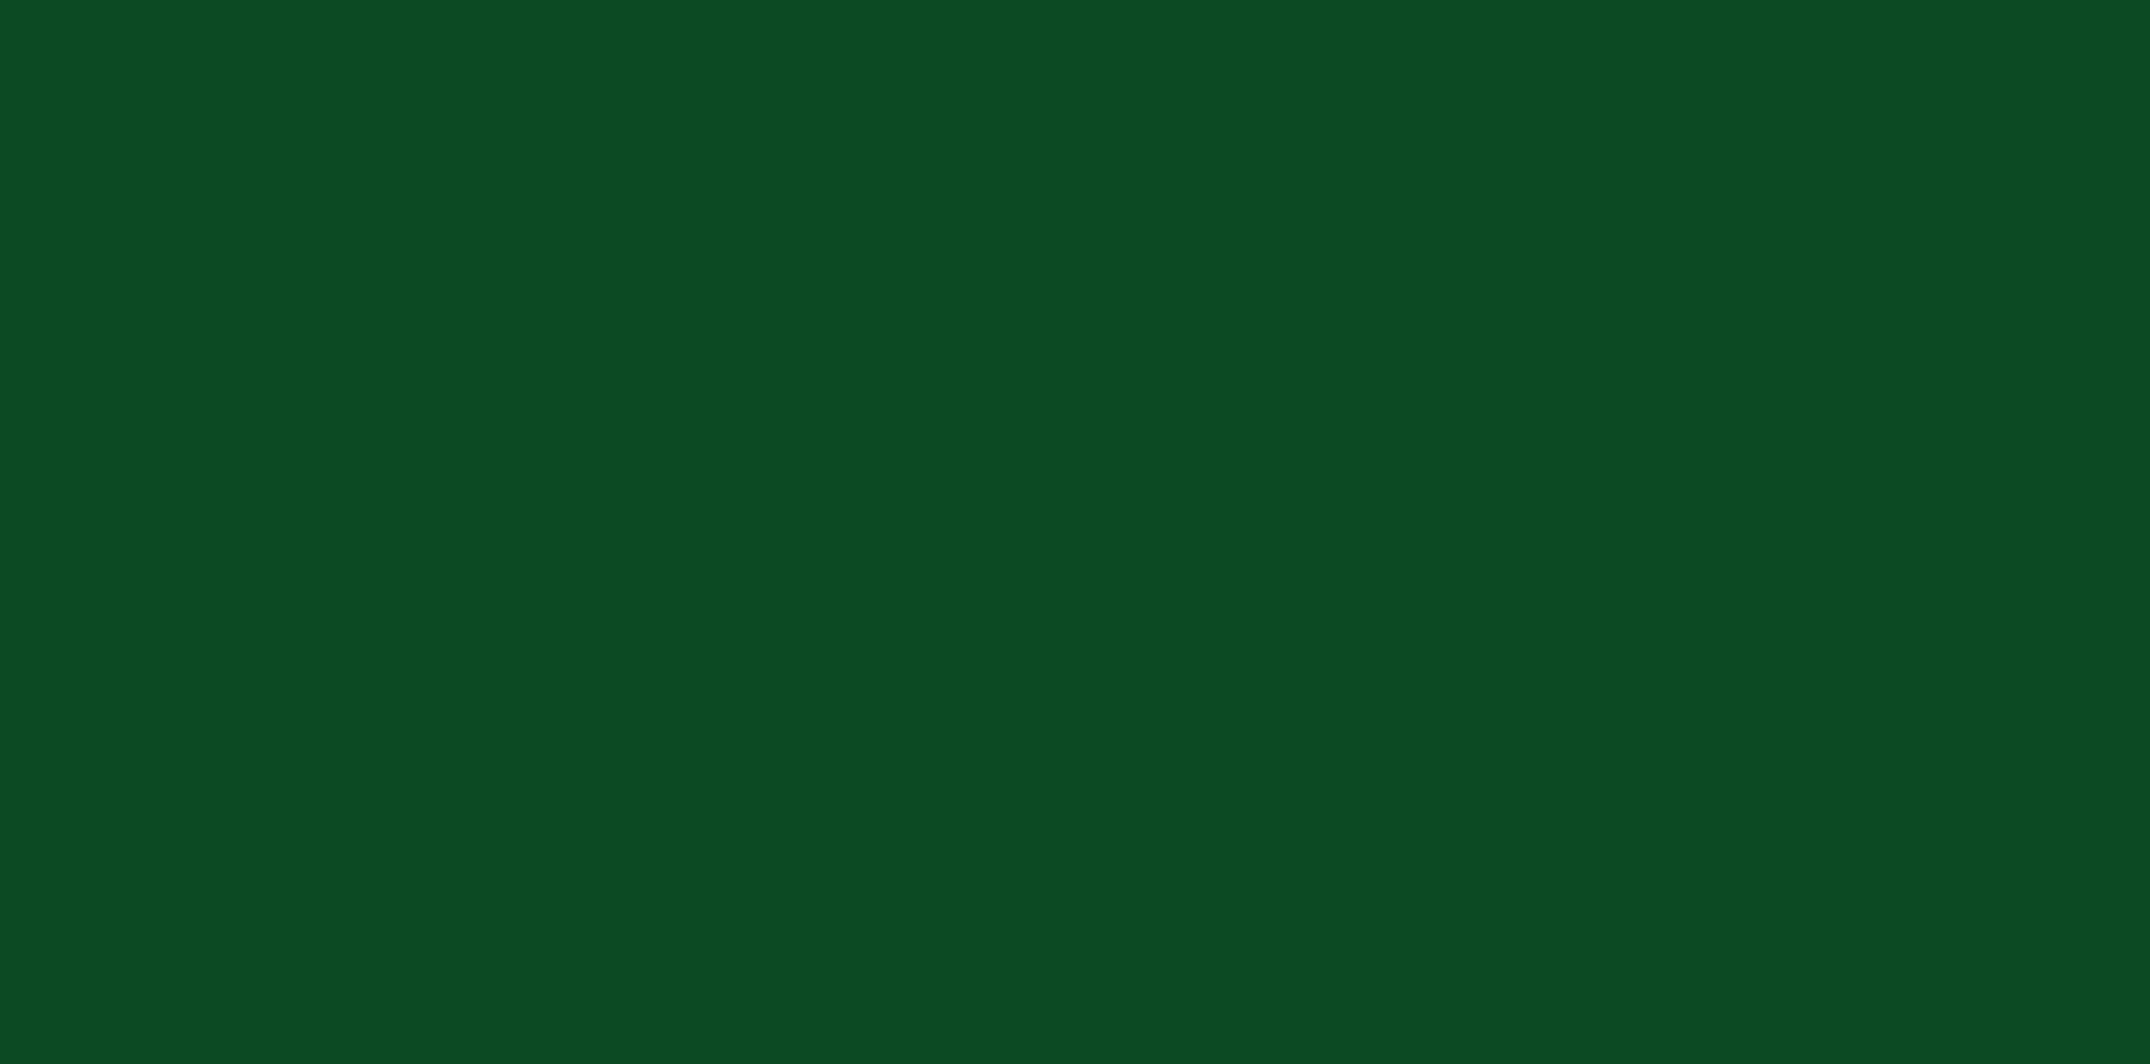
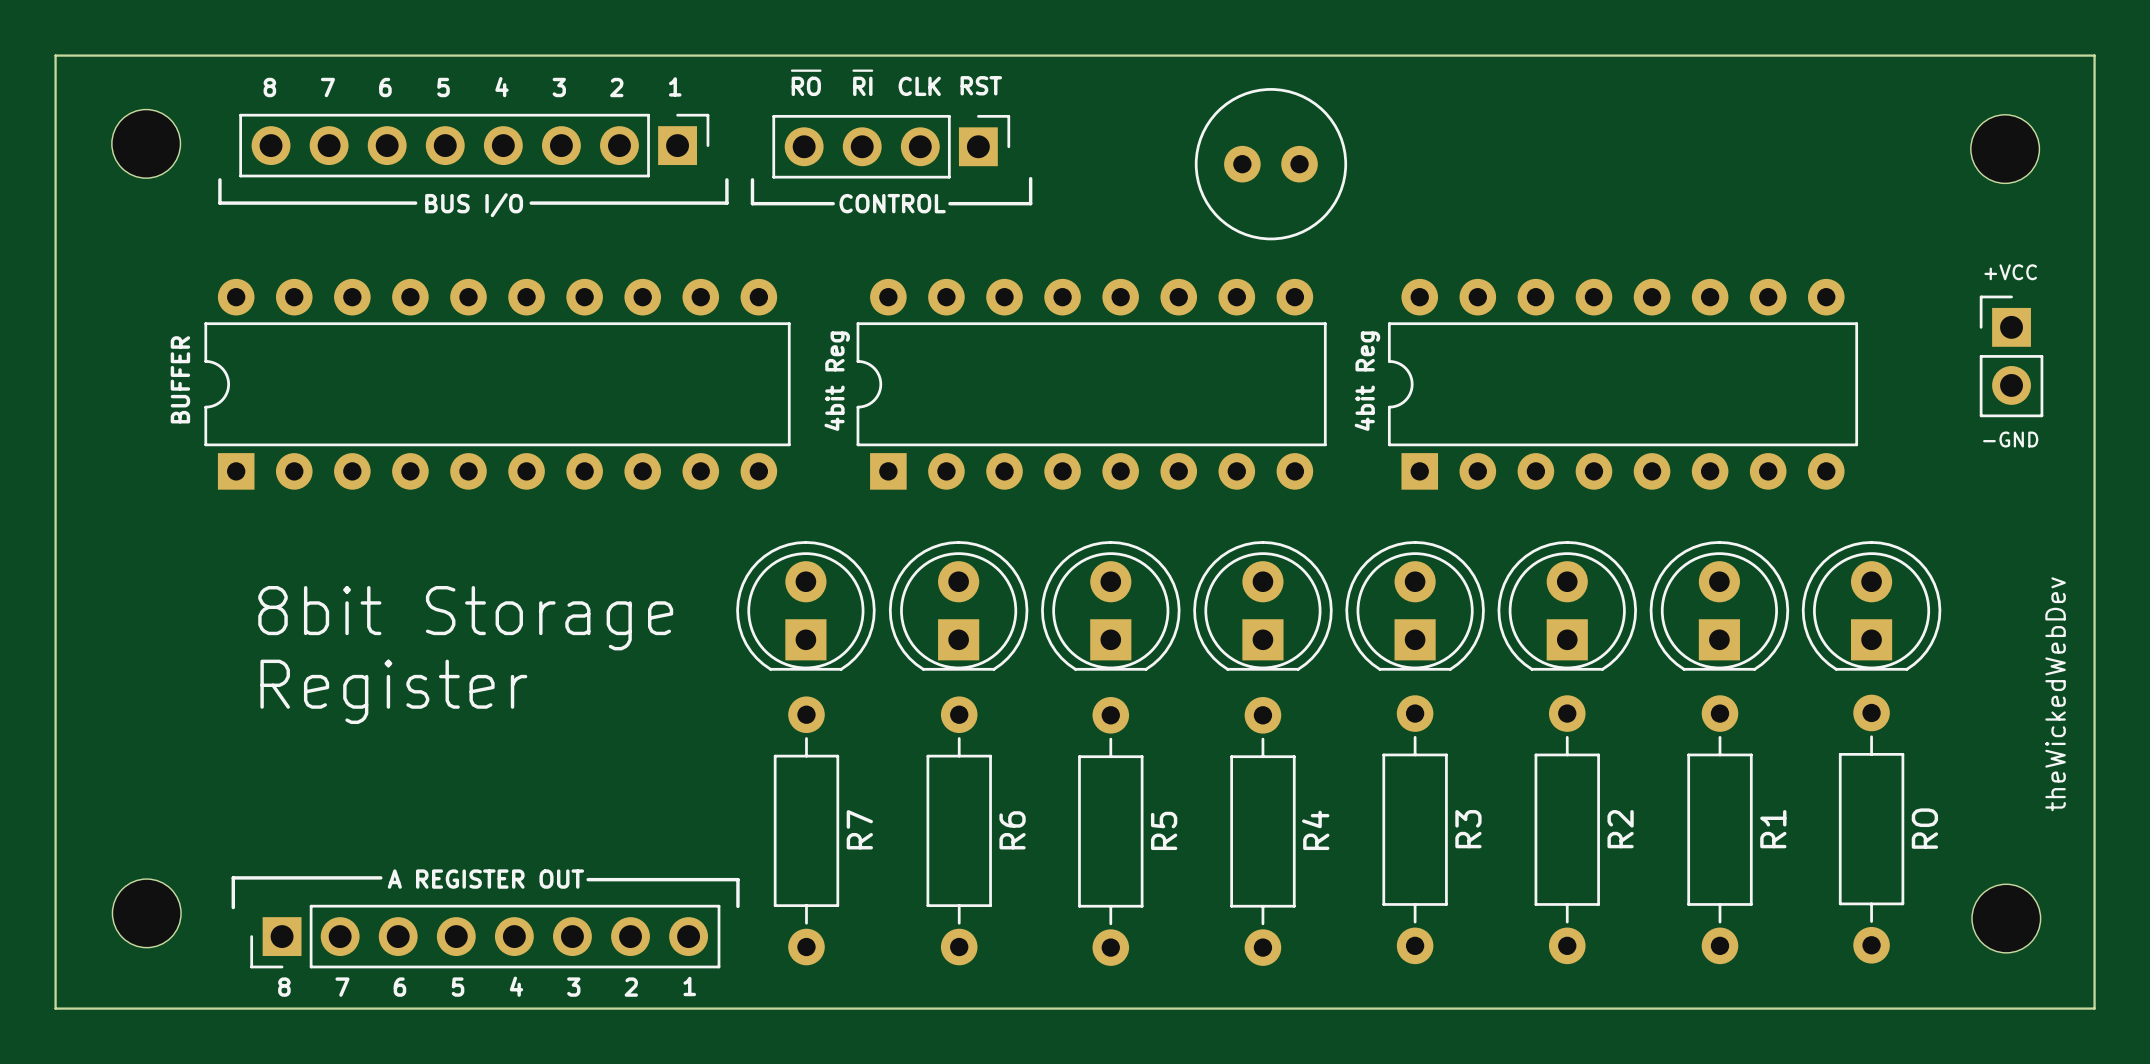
board edge: none -> (55, 55) (2094, 55) (2094, 1008) (55, 1008) (55, 55)
line: none -> (791, 70) (820, 70)
line: none -> (853, 70) (872, 70)
text: none -> RST (981, 85)
text: none -> 1 (675, 86)
text: none -> RO (806, 86)
text: none -> RI (862, 86)
text: none -> CLK (919, 86)
text: none -> 8 (269, 87)
text: none -> 7 (327, 87)
text: none -> 6 (385, 87)
text: none -> 5 (443, 87)
text: none -> 4 (501, 87)
text: none -> 3 (559, 87)
text: none -> 2 (616, 87)
part: none -> (146, 143)
part: none -> (474, 145)
part: none -> (891, 146)
part: none -> (2005, 149)
part: none -> (1270, 164)
line: none -> (1030, 178) (1030, 203) (949, 203)
line: none -> (219, 179) (219, 203) (415, 203)
line: none -> (726, 179) (726, 203) (531, 203)
line: none -> (752, 179) (752, 203) (833, 203)
text: none -> CONTROL (892, 203)
text: none -> BUS I/O (474, 205)
text: none -> +VCC (2010, 272)
part: none -> (2011, 356)
text: none -> BUFFER (180, 379)
text: none -> 4bit Reg (837, 381)
text: none -> 4bit Reg (1367, 381)
part: none -> (497, 384)
part: none -> (1091, 384)
part: none -> (1623, 384)
text: none -> -GND (2010, 439)
part: none -> (805, 605)
part: none -> (958, 605)
part: none -> (1110, 605)
part: none -> (1262, 605)
part: none -> (1415, 605)
part: none -> (1567, 605)
part: none -> (1719, 605)
part: none -> (1871, 605)
text: none -> 8bit Storage (465, 618)
text: none -> Register (393, 691)
text: none -> theWickedWebDev (2055, 694)
R3: none -> (1415, 829)
R2: none -> (1567, 829)
R1: none -> (1719, 829)
RO: none -> (1871, 829)
R7: none -> (806, 830)
R6: none -> (959, 830)
R5: none -> (1110, 831)
R4: none -> (1262, 831)
line: none -> (380, 877) (233, 877) (233, 907)
text: none -> A REGISTER OUT (485, 879)
line: none -> (588, 879) (737, 879) (737, 906)
part: none -> (146, 913)
part: none -> (2006, 918)
part: none -> (485, 936)
text: none -> 4 (516, 986)
text: none -> 1 (689, 986)
text: none -> 8 (284, 987)
text: none -> 7 (342, 987)
text: none -> 6 (399, 987)
text: none -> 5 (458, 987)
text: none -> 3 (573, 987)
text: none -> 2 (631, 987)

